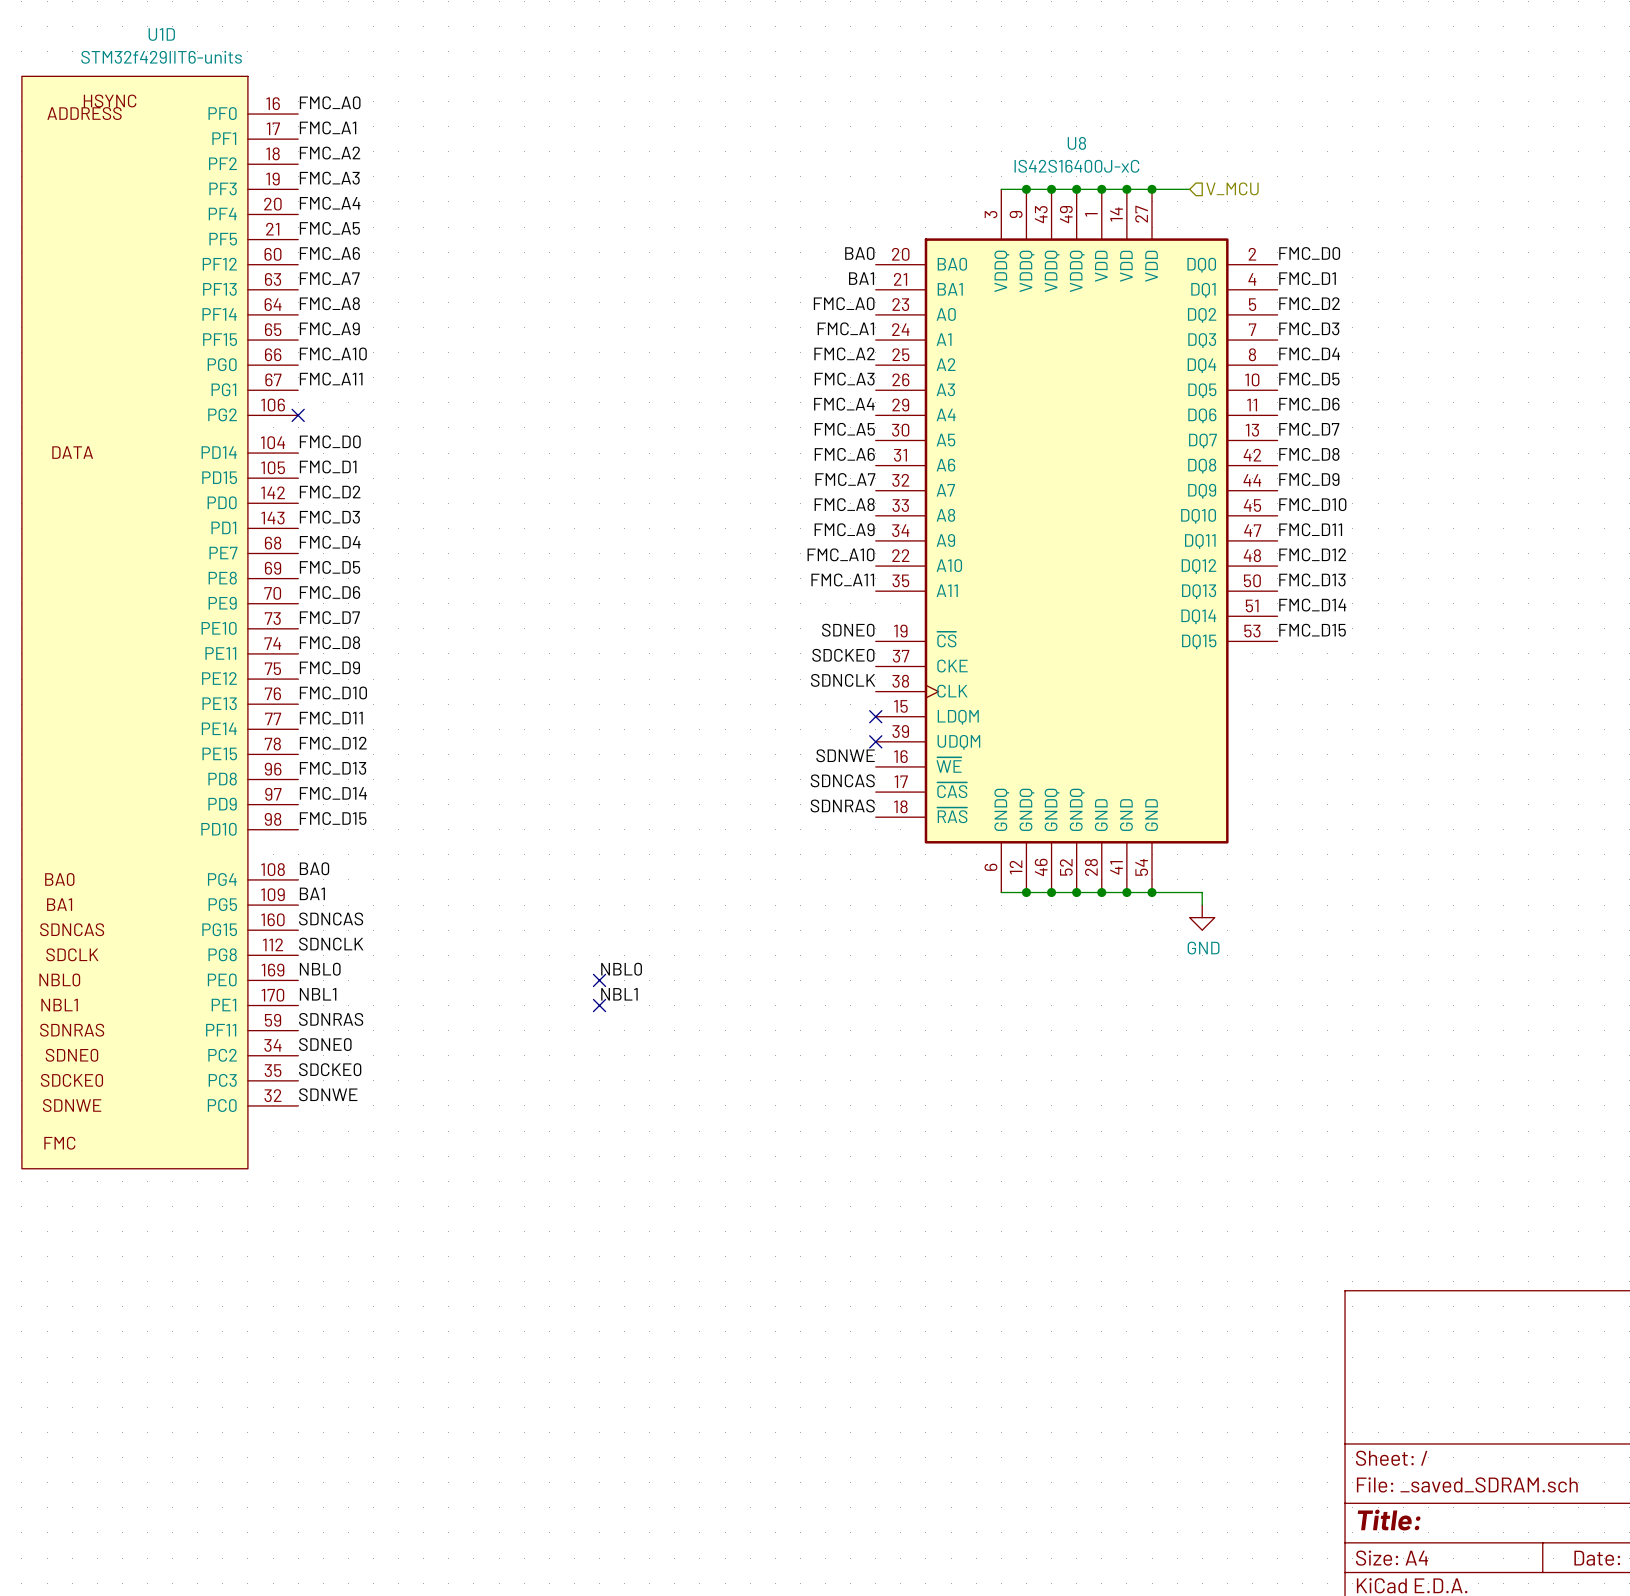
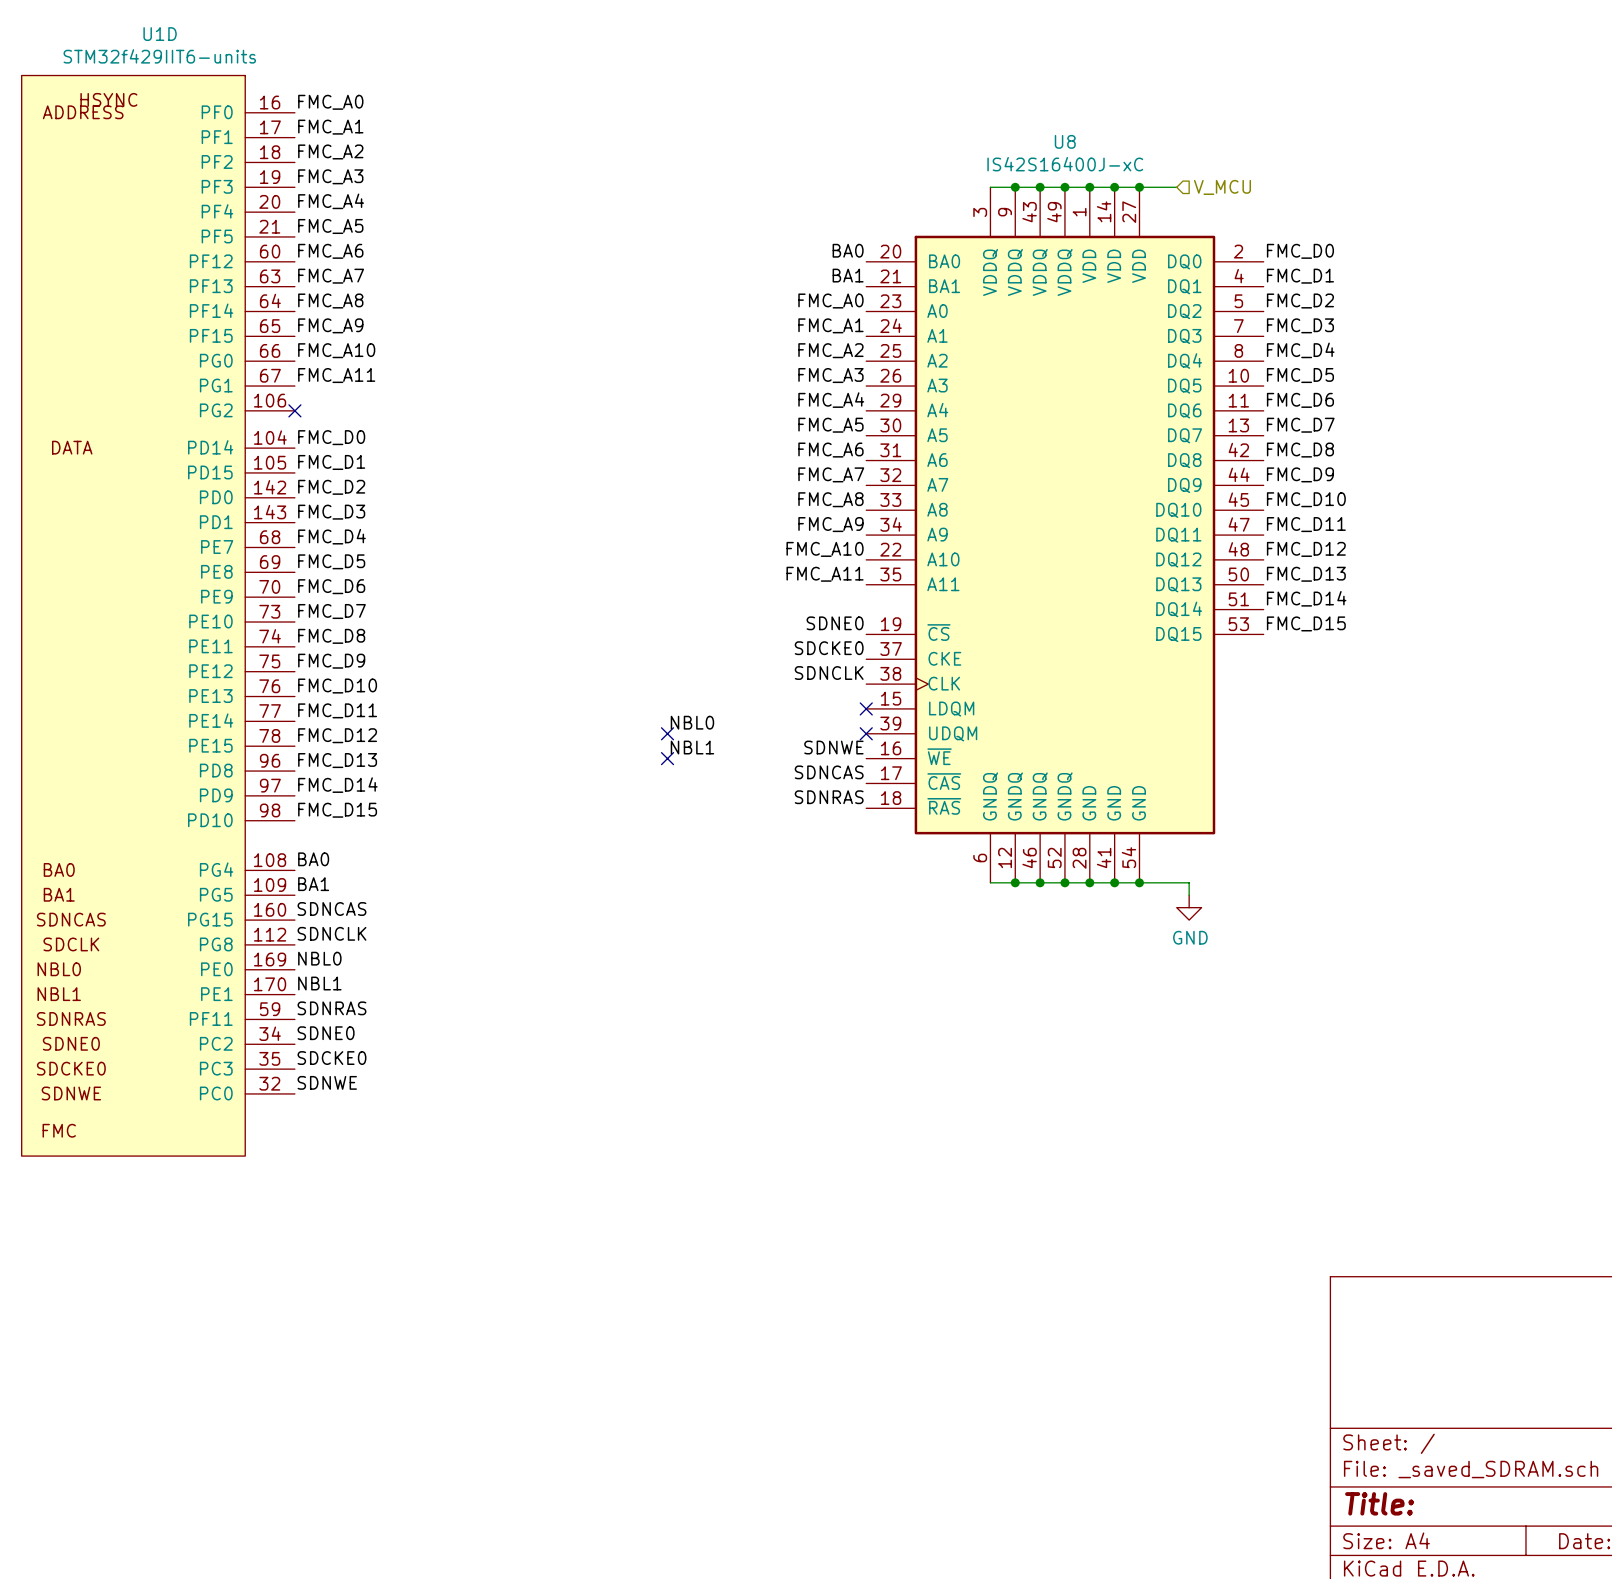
label: none -> NBL0 (692, 722)
no-connect mark: none -> (667, 733)
label: none -> NBL1 (692, 747)
no-connect mark: none -> (667, 758)
label: NBL0 (621, 969) -> none
no-connect mark: (599, 980) -> none
label: NBL1 (619, 994) -> none
no-connect mark: (599, 1005) -> none

